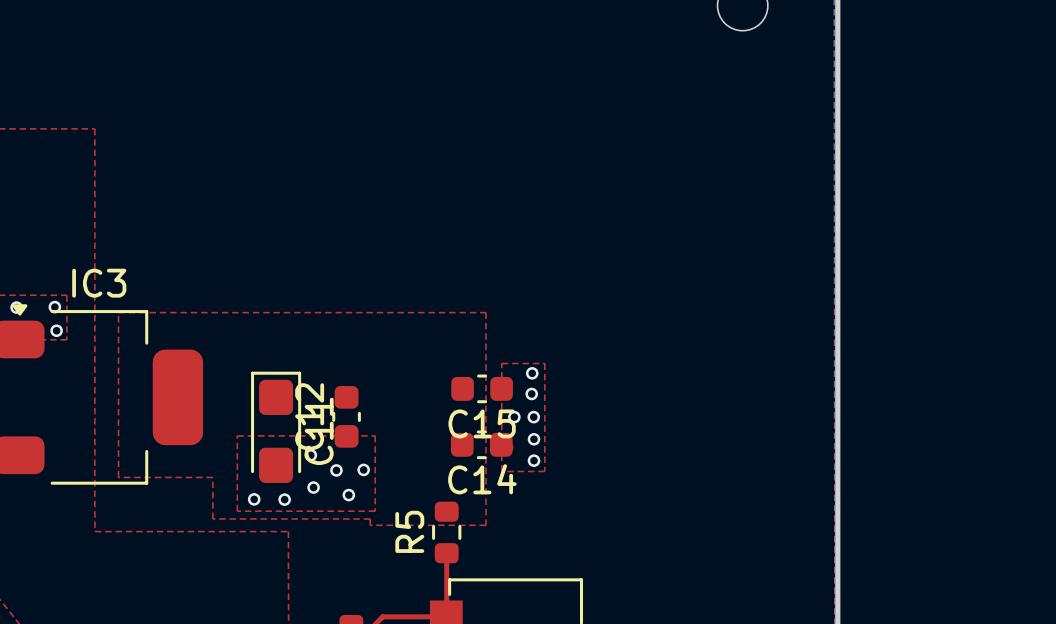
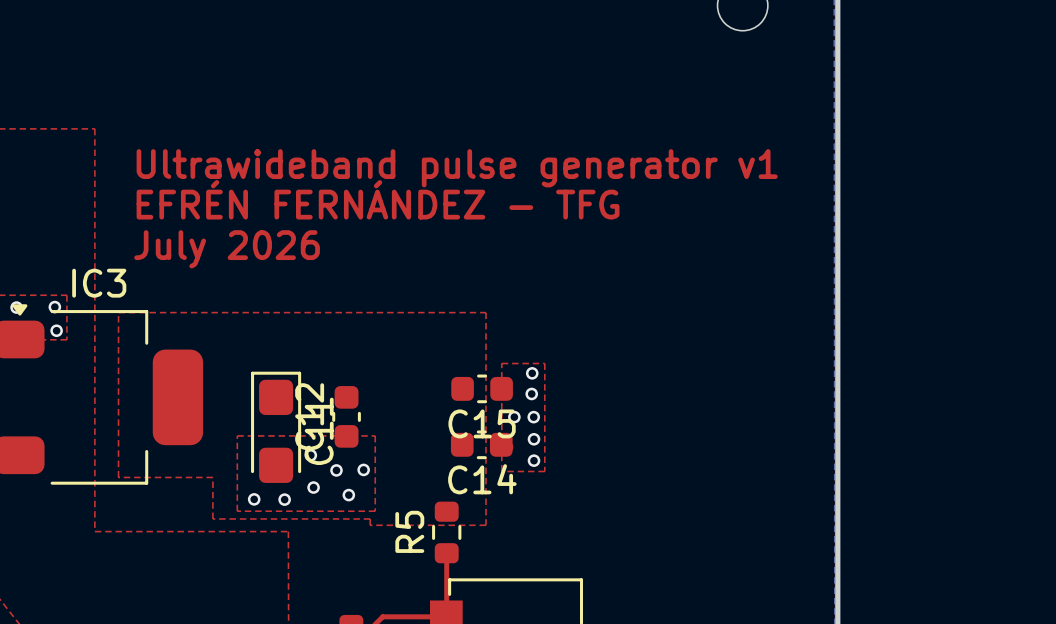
text: none -> Ultrawideband pulse generator v1 (457, 168)
text: none -> EFRÉN FERNÁNDEZ - TFG (378, 199)
text: none -> July 2026 (227, 249)

